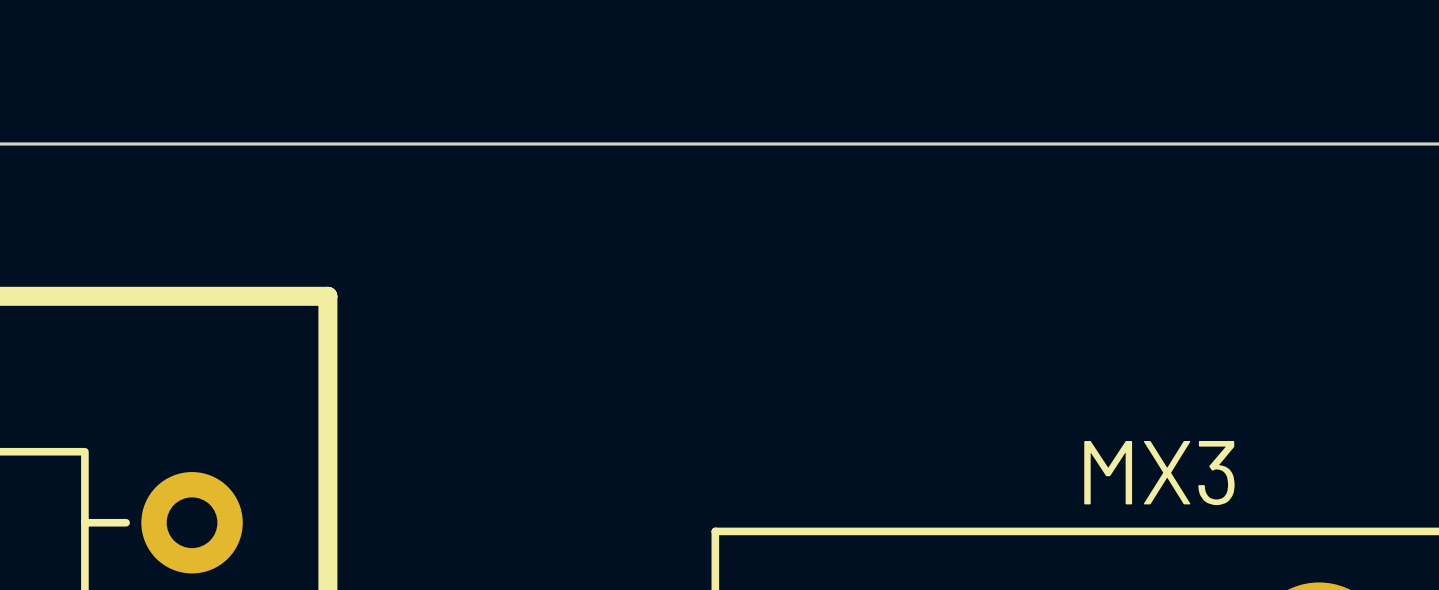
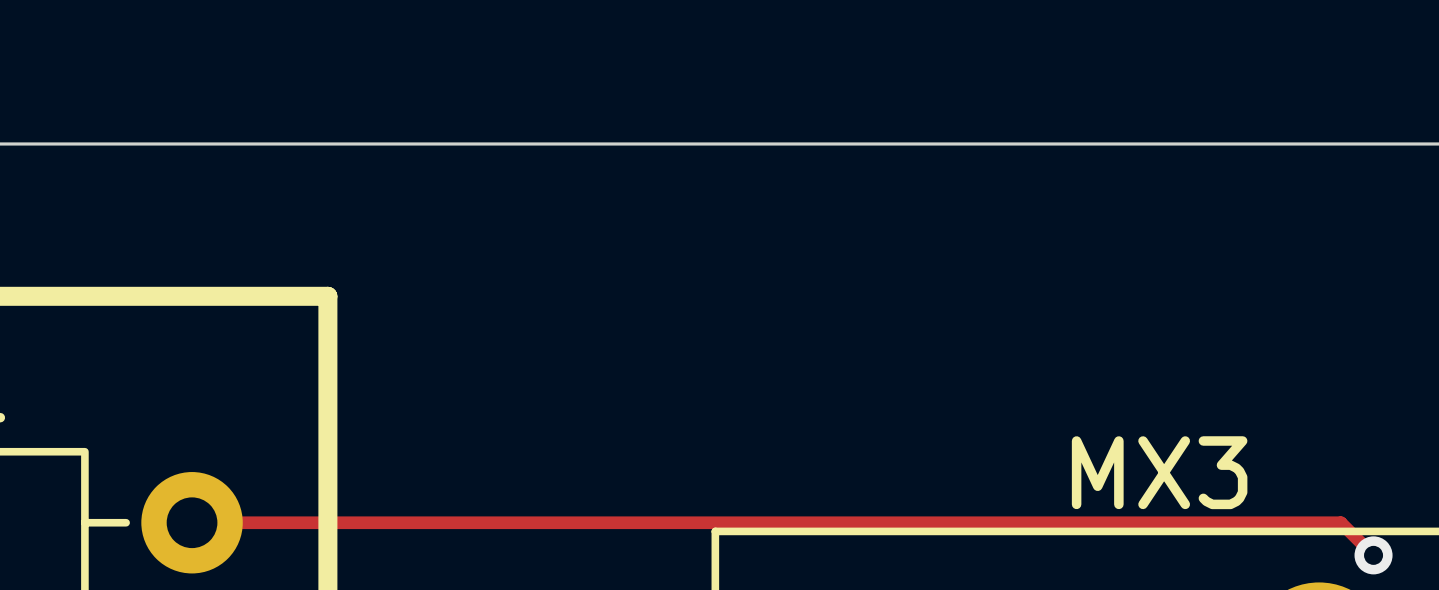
track: none -> (192, 522) (1340, 522) (1373, 555)
via: none -> (1373, 555)

